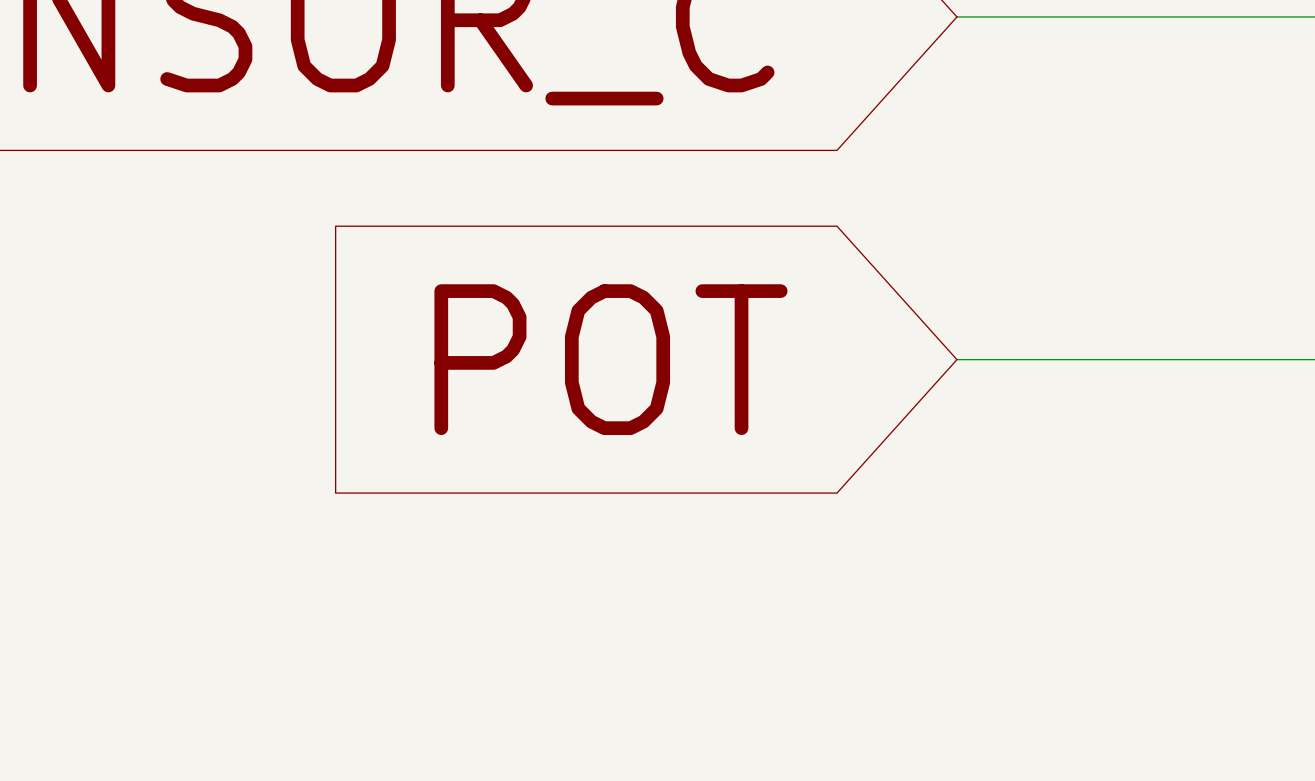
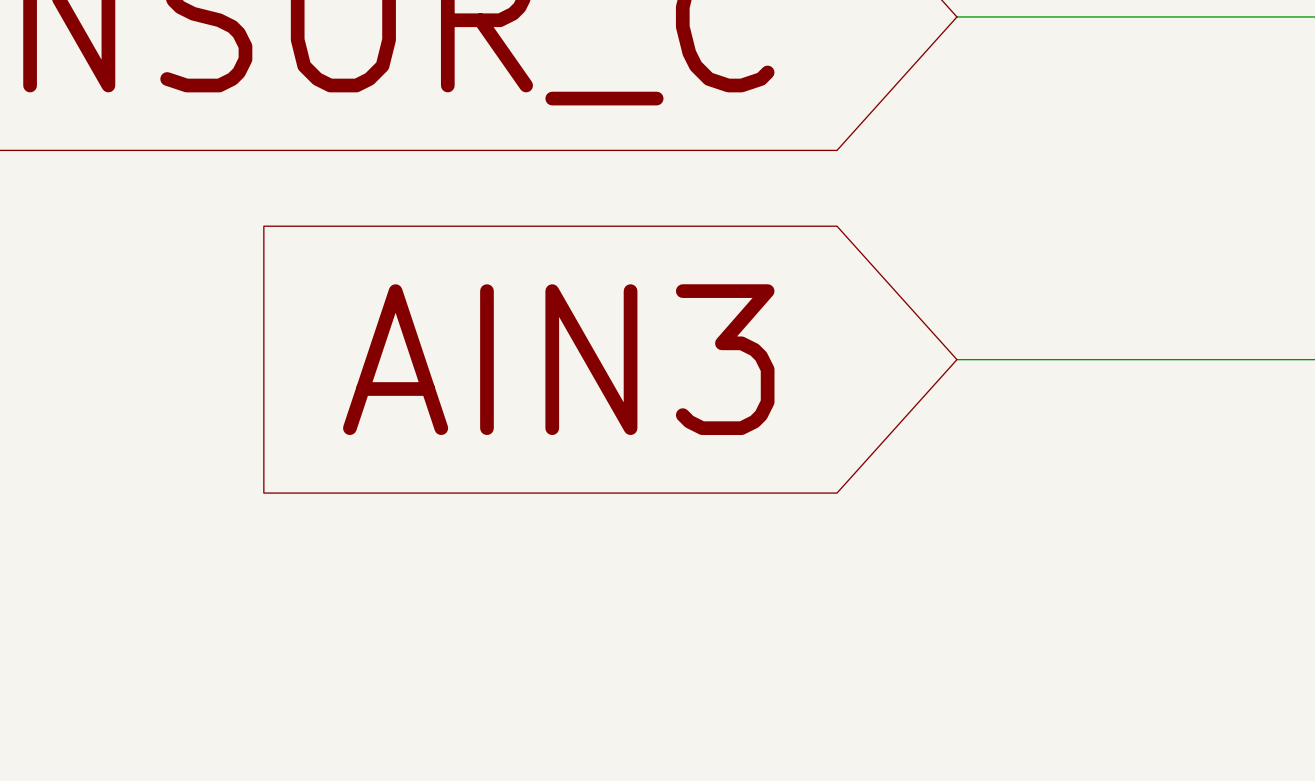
global label: POT (610, 359) -> AIN3 (558, 359)

